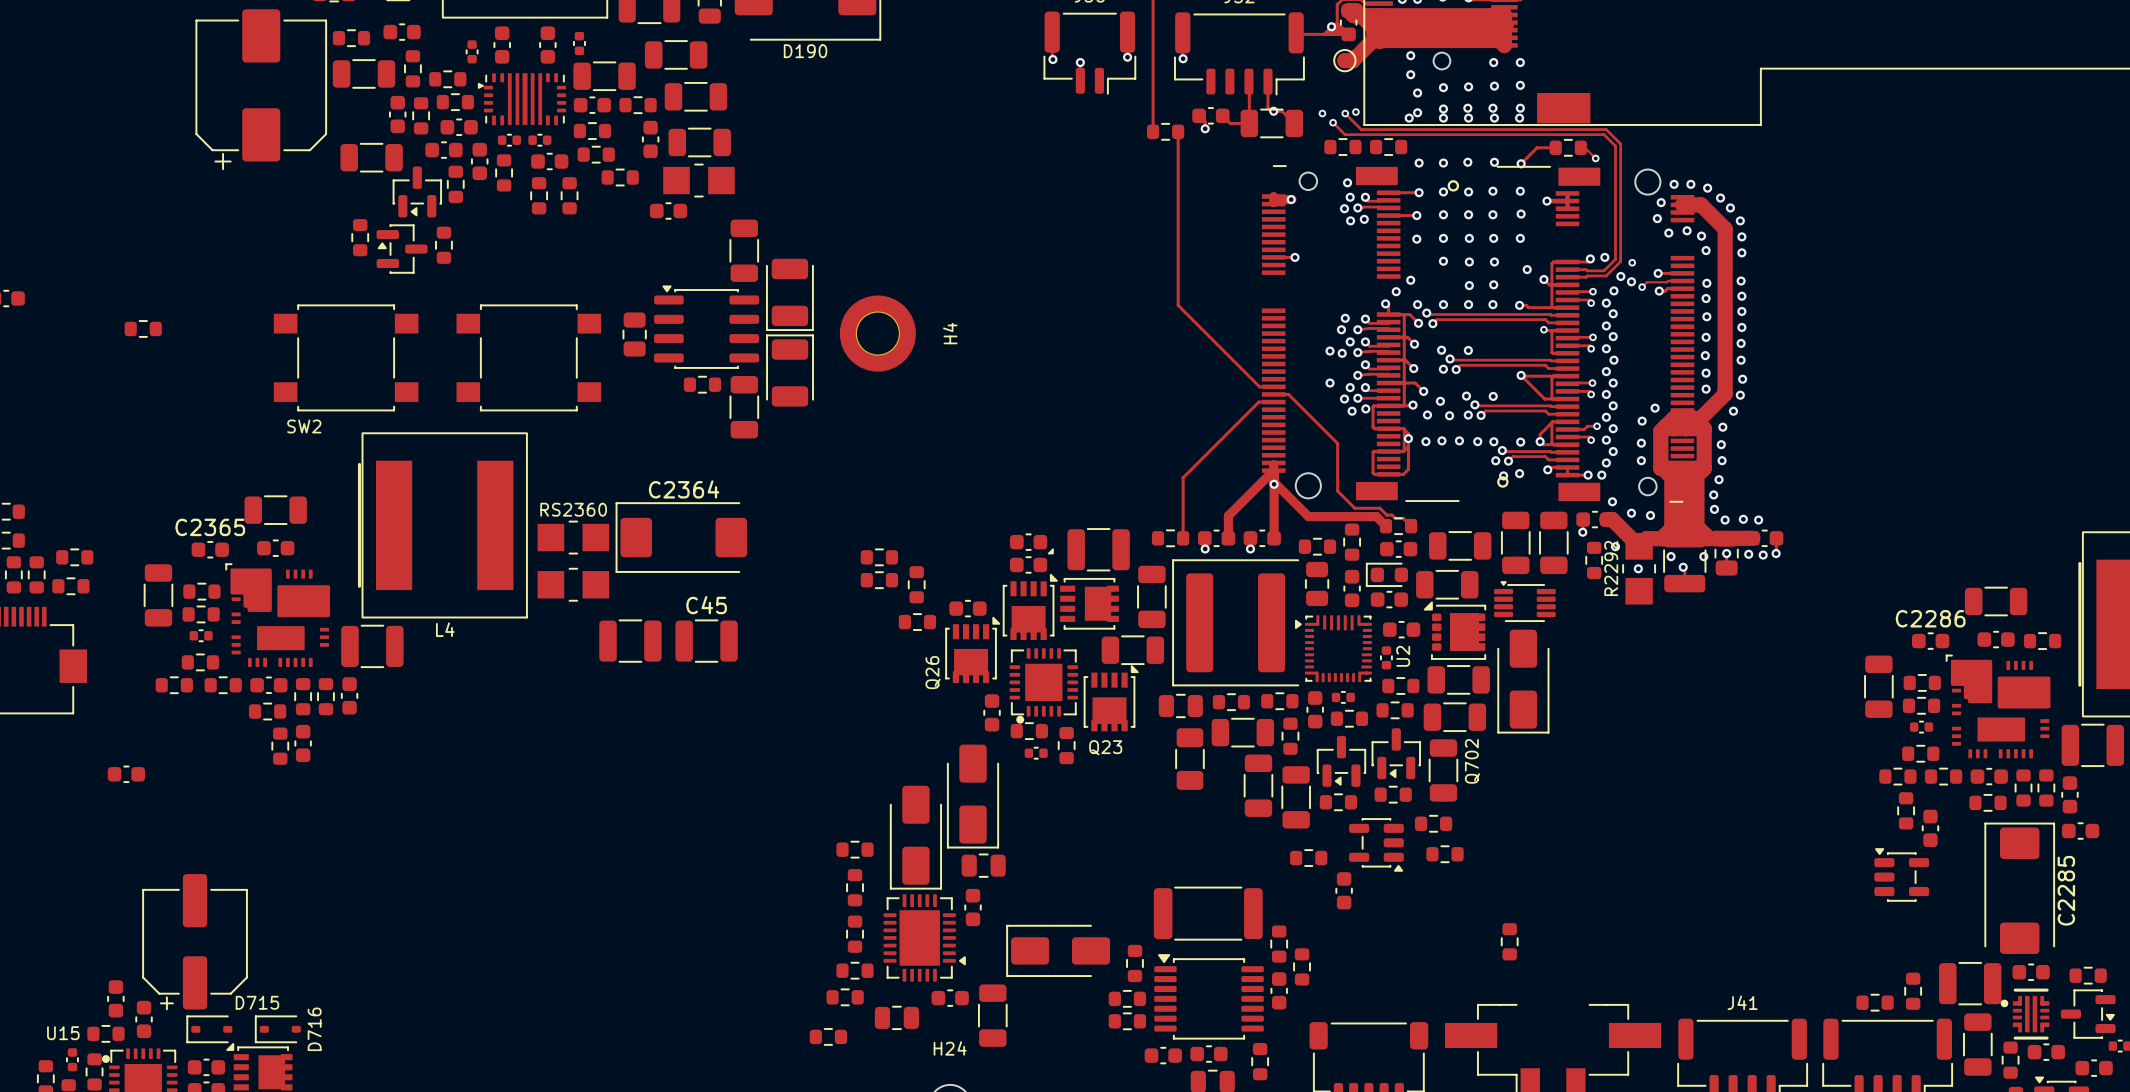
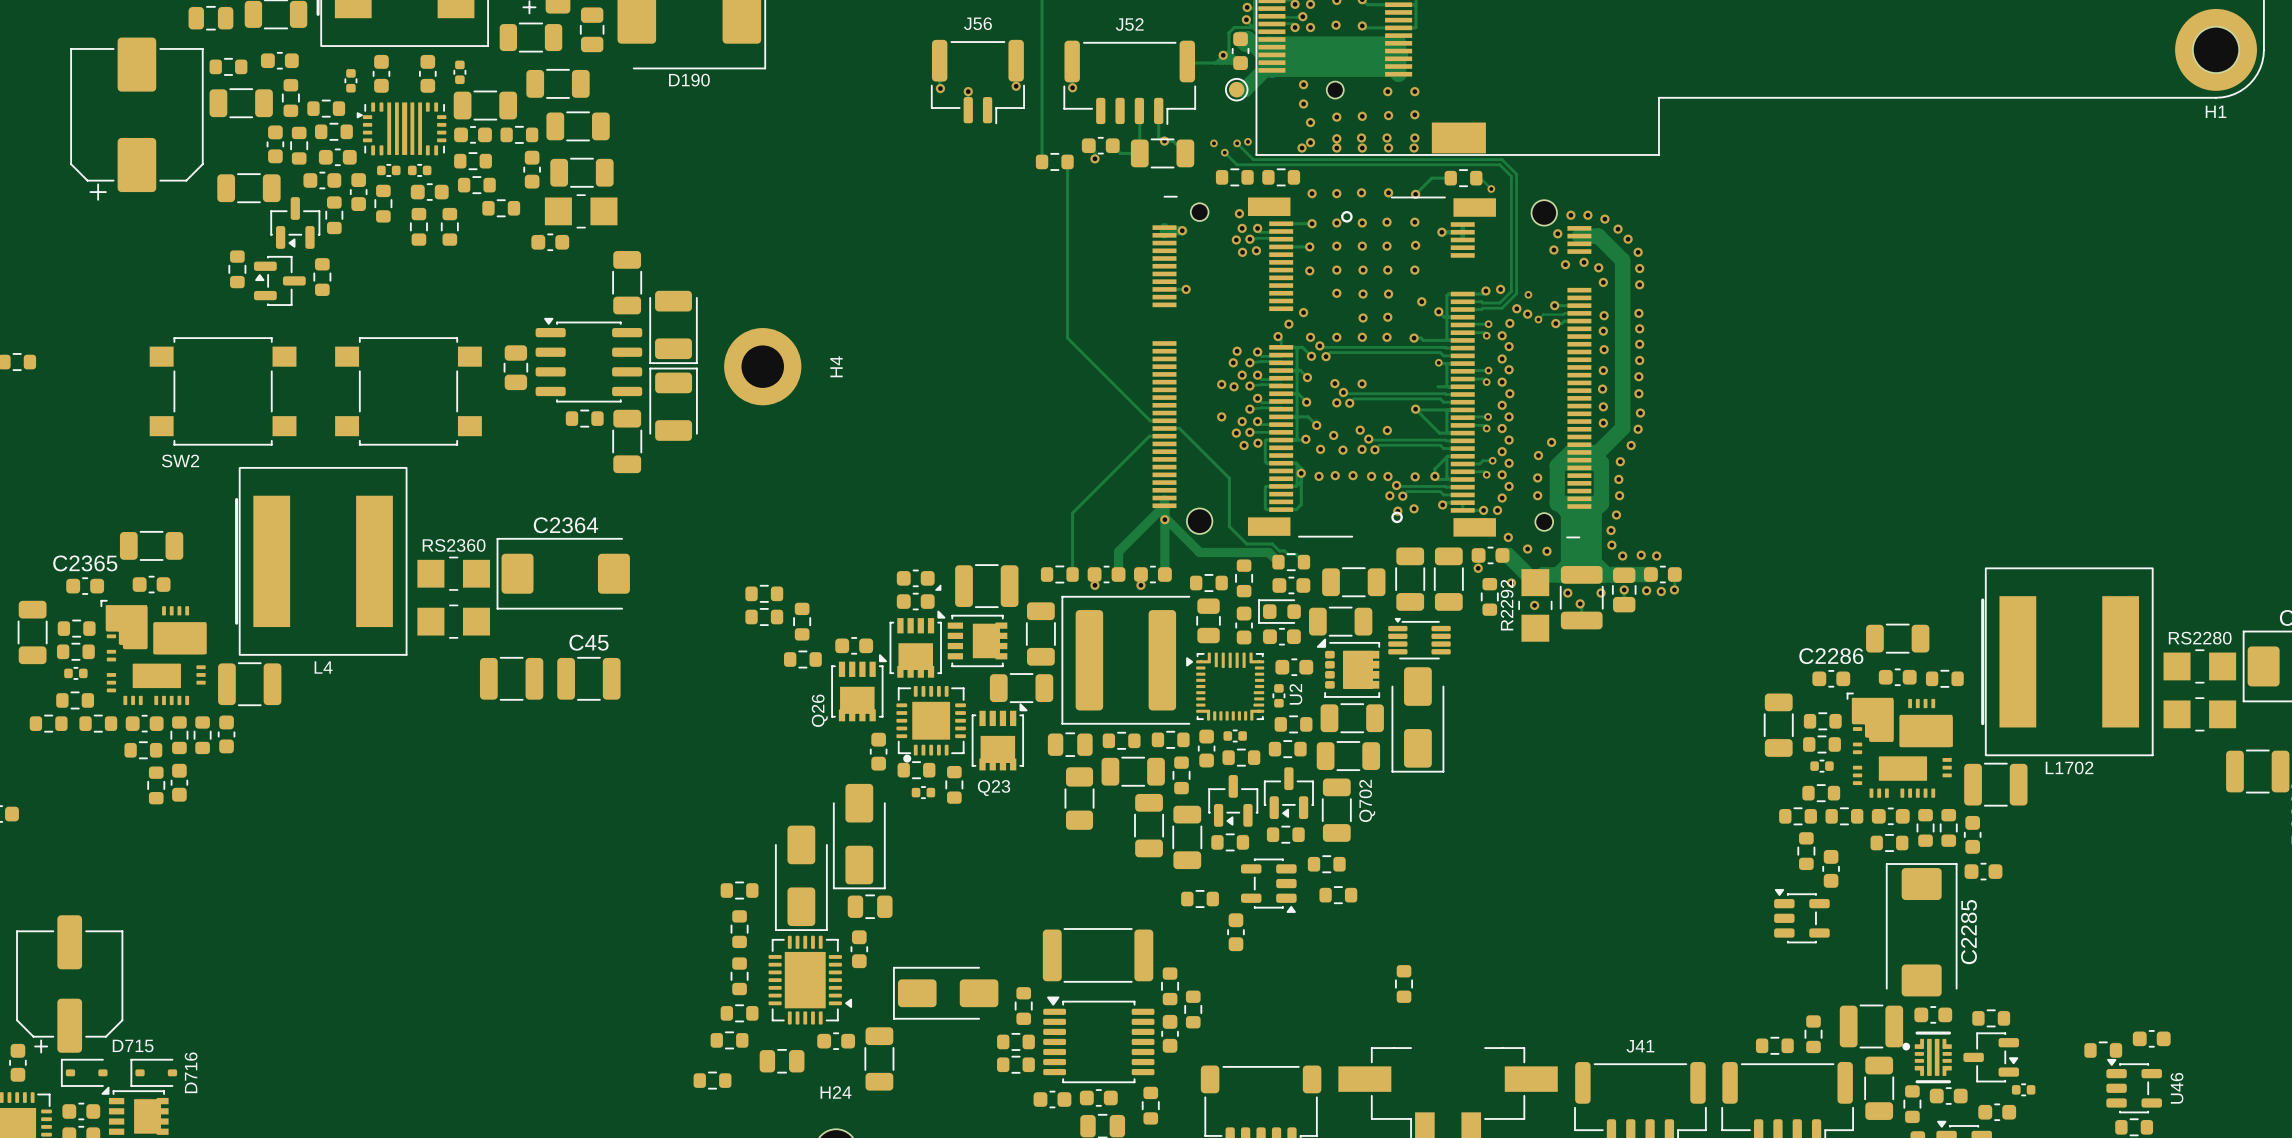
track: none -> (1438, 386) (1447, 386)

